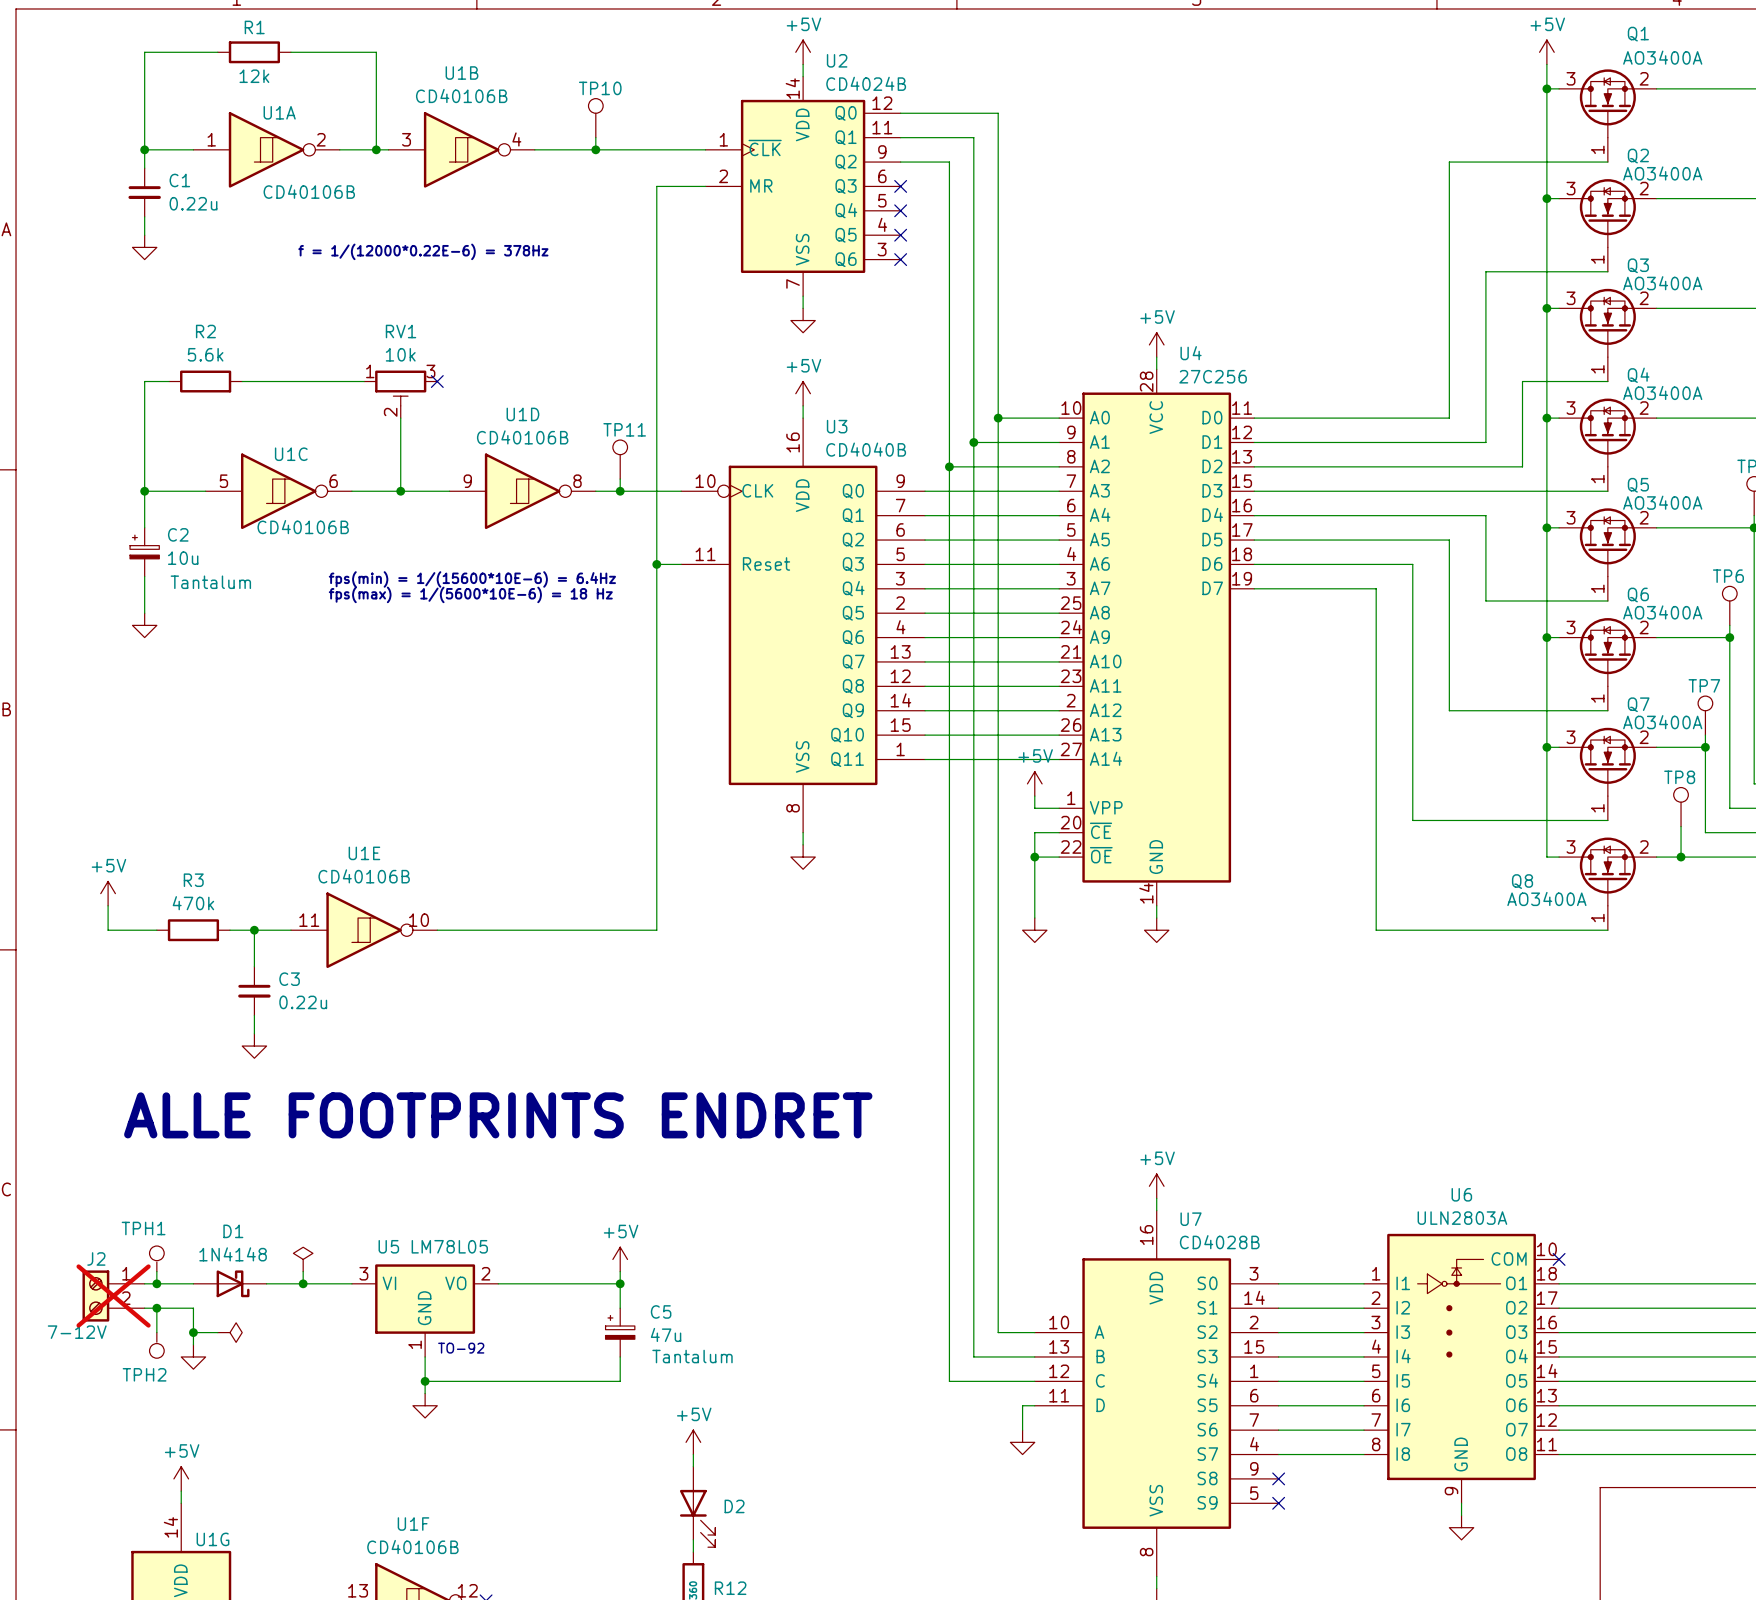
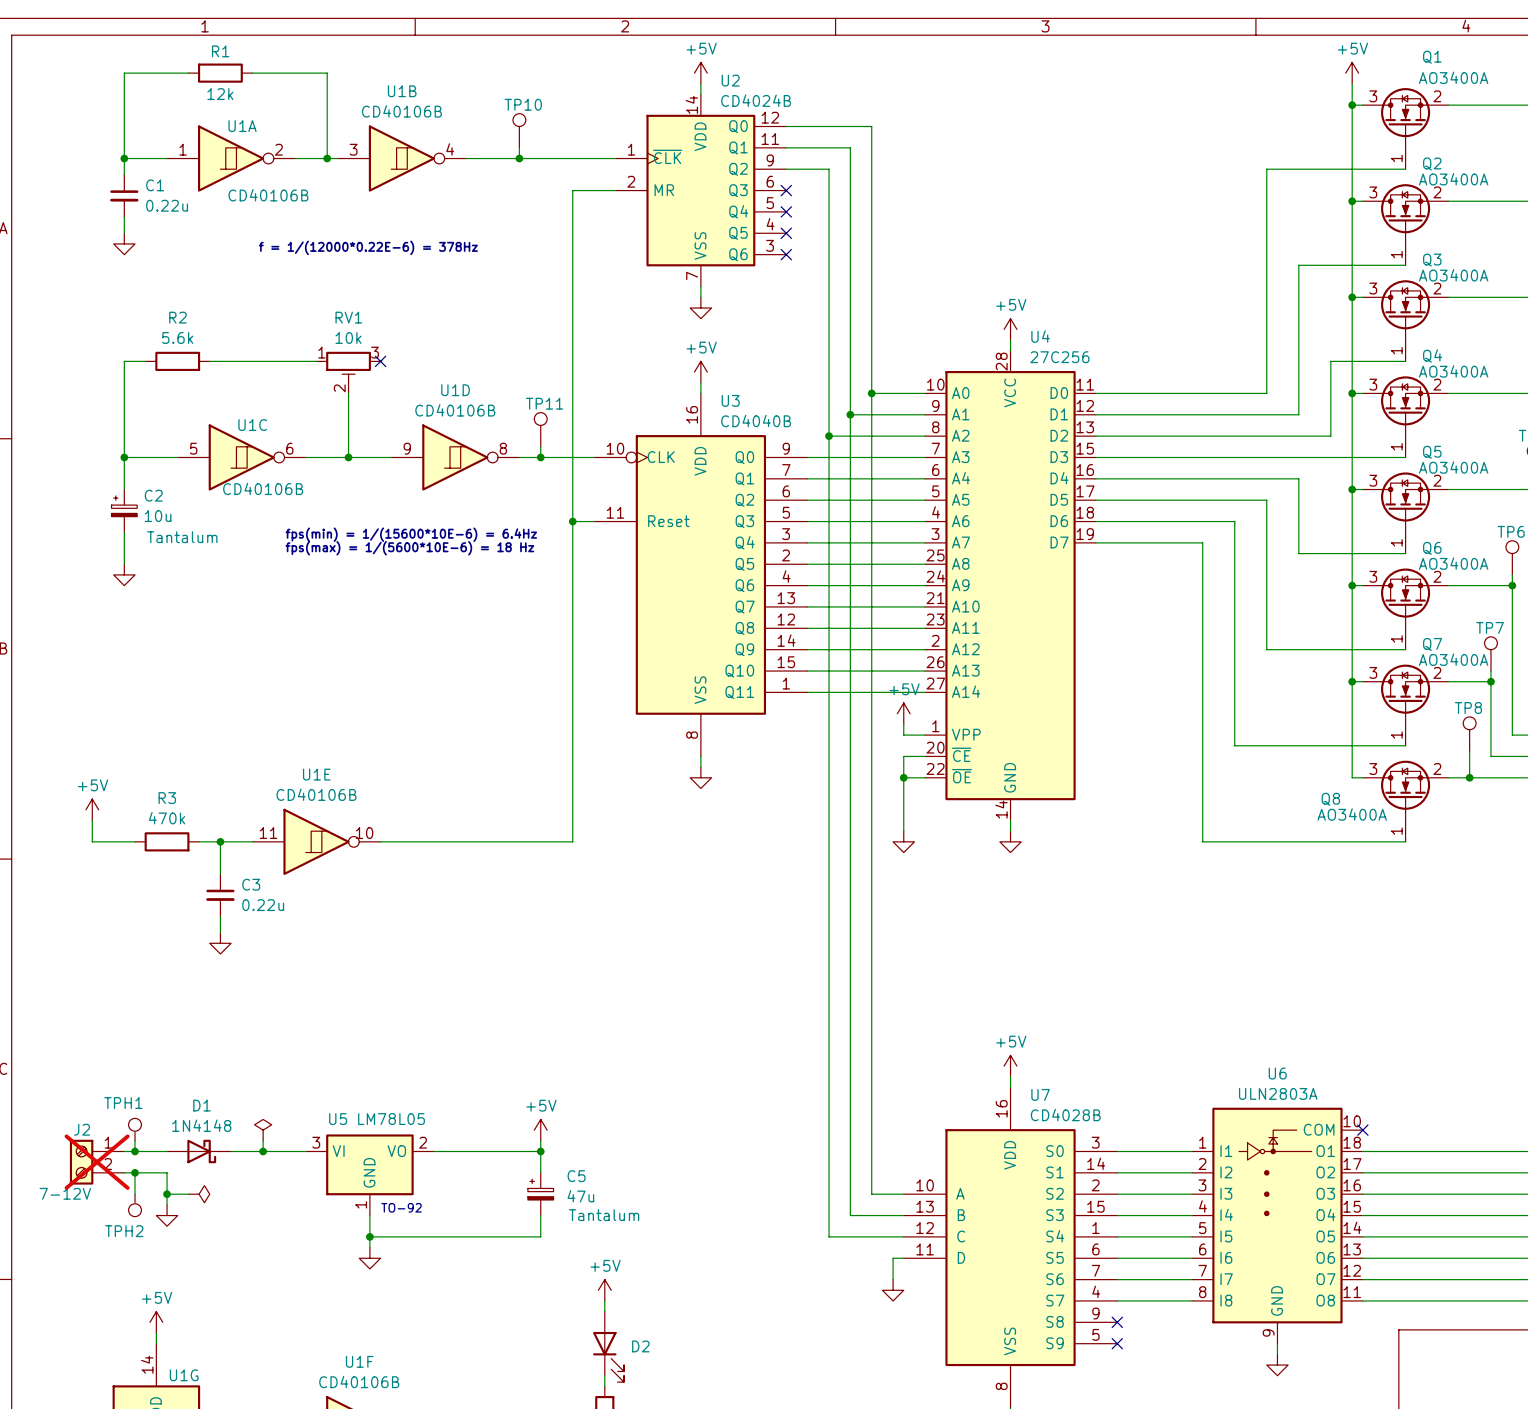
text: ALLE FOOTPRINTS ENDRET (498, 1115) -> none

